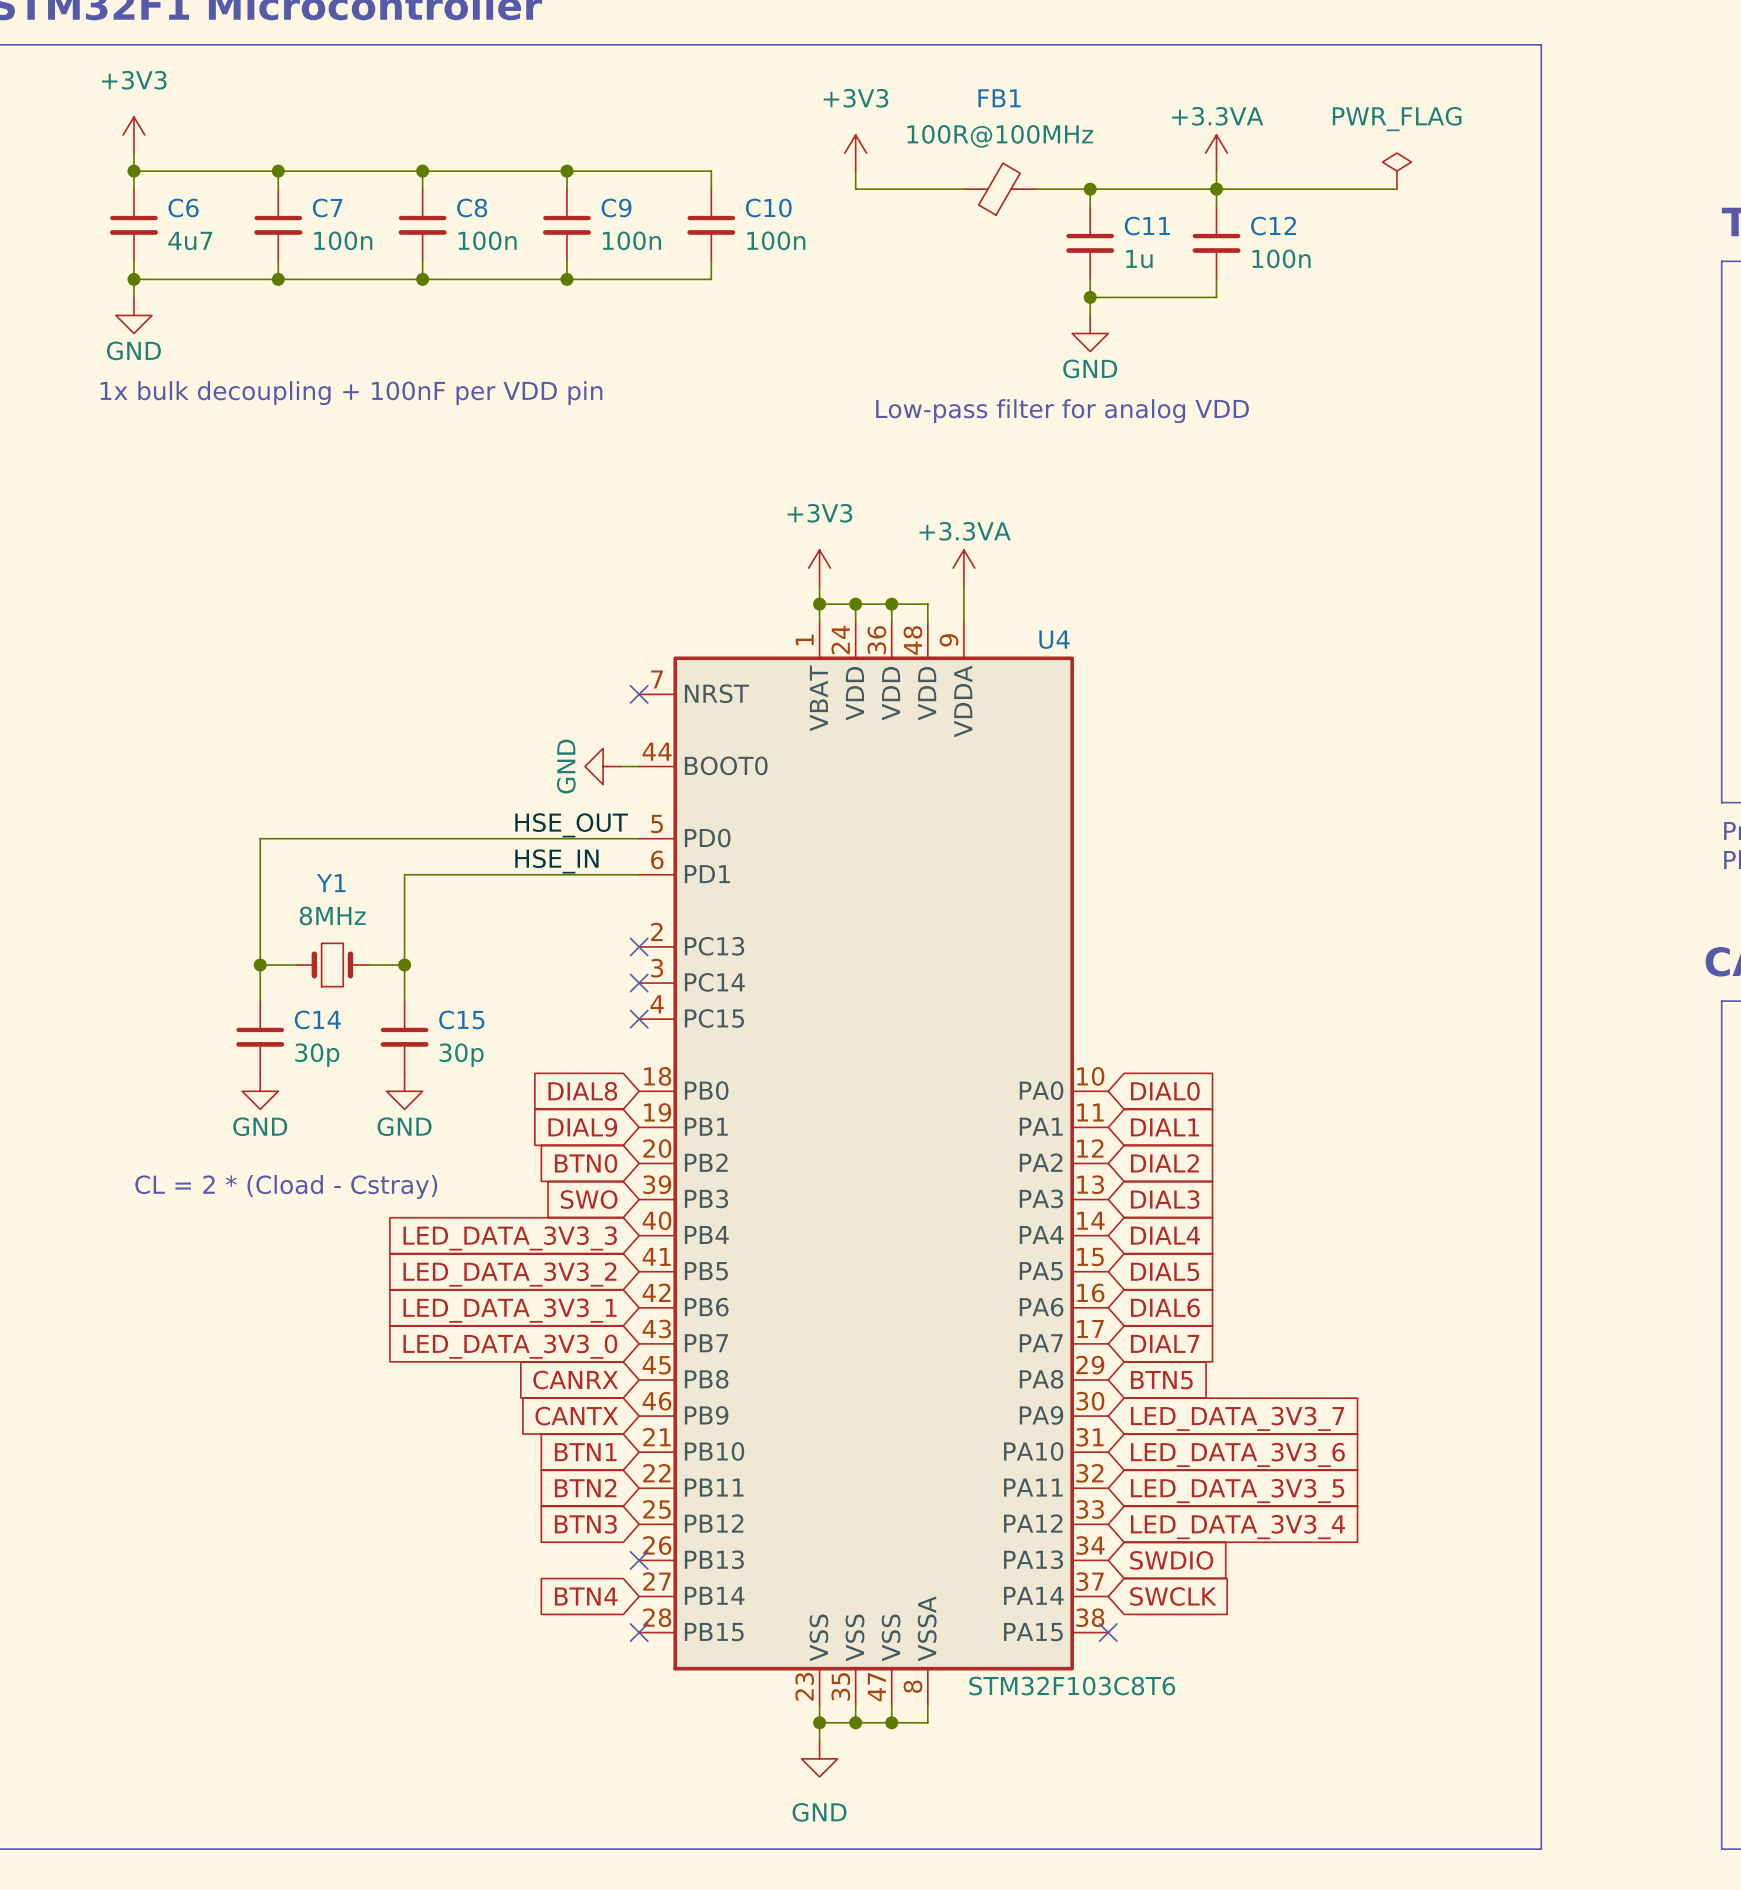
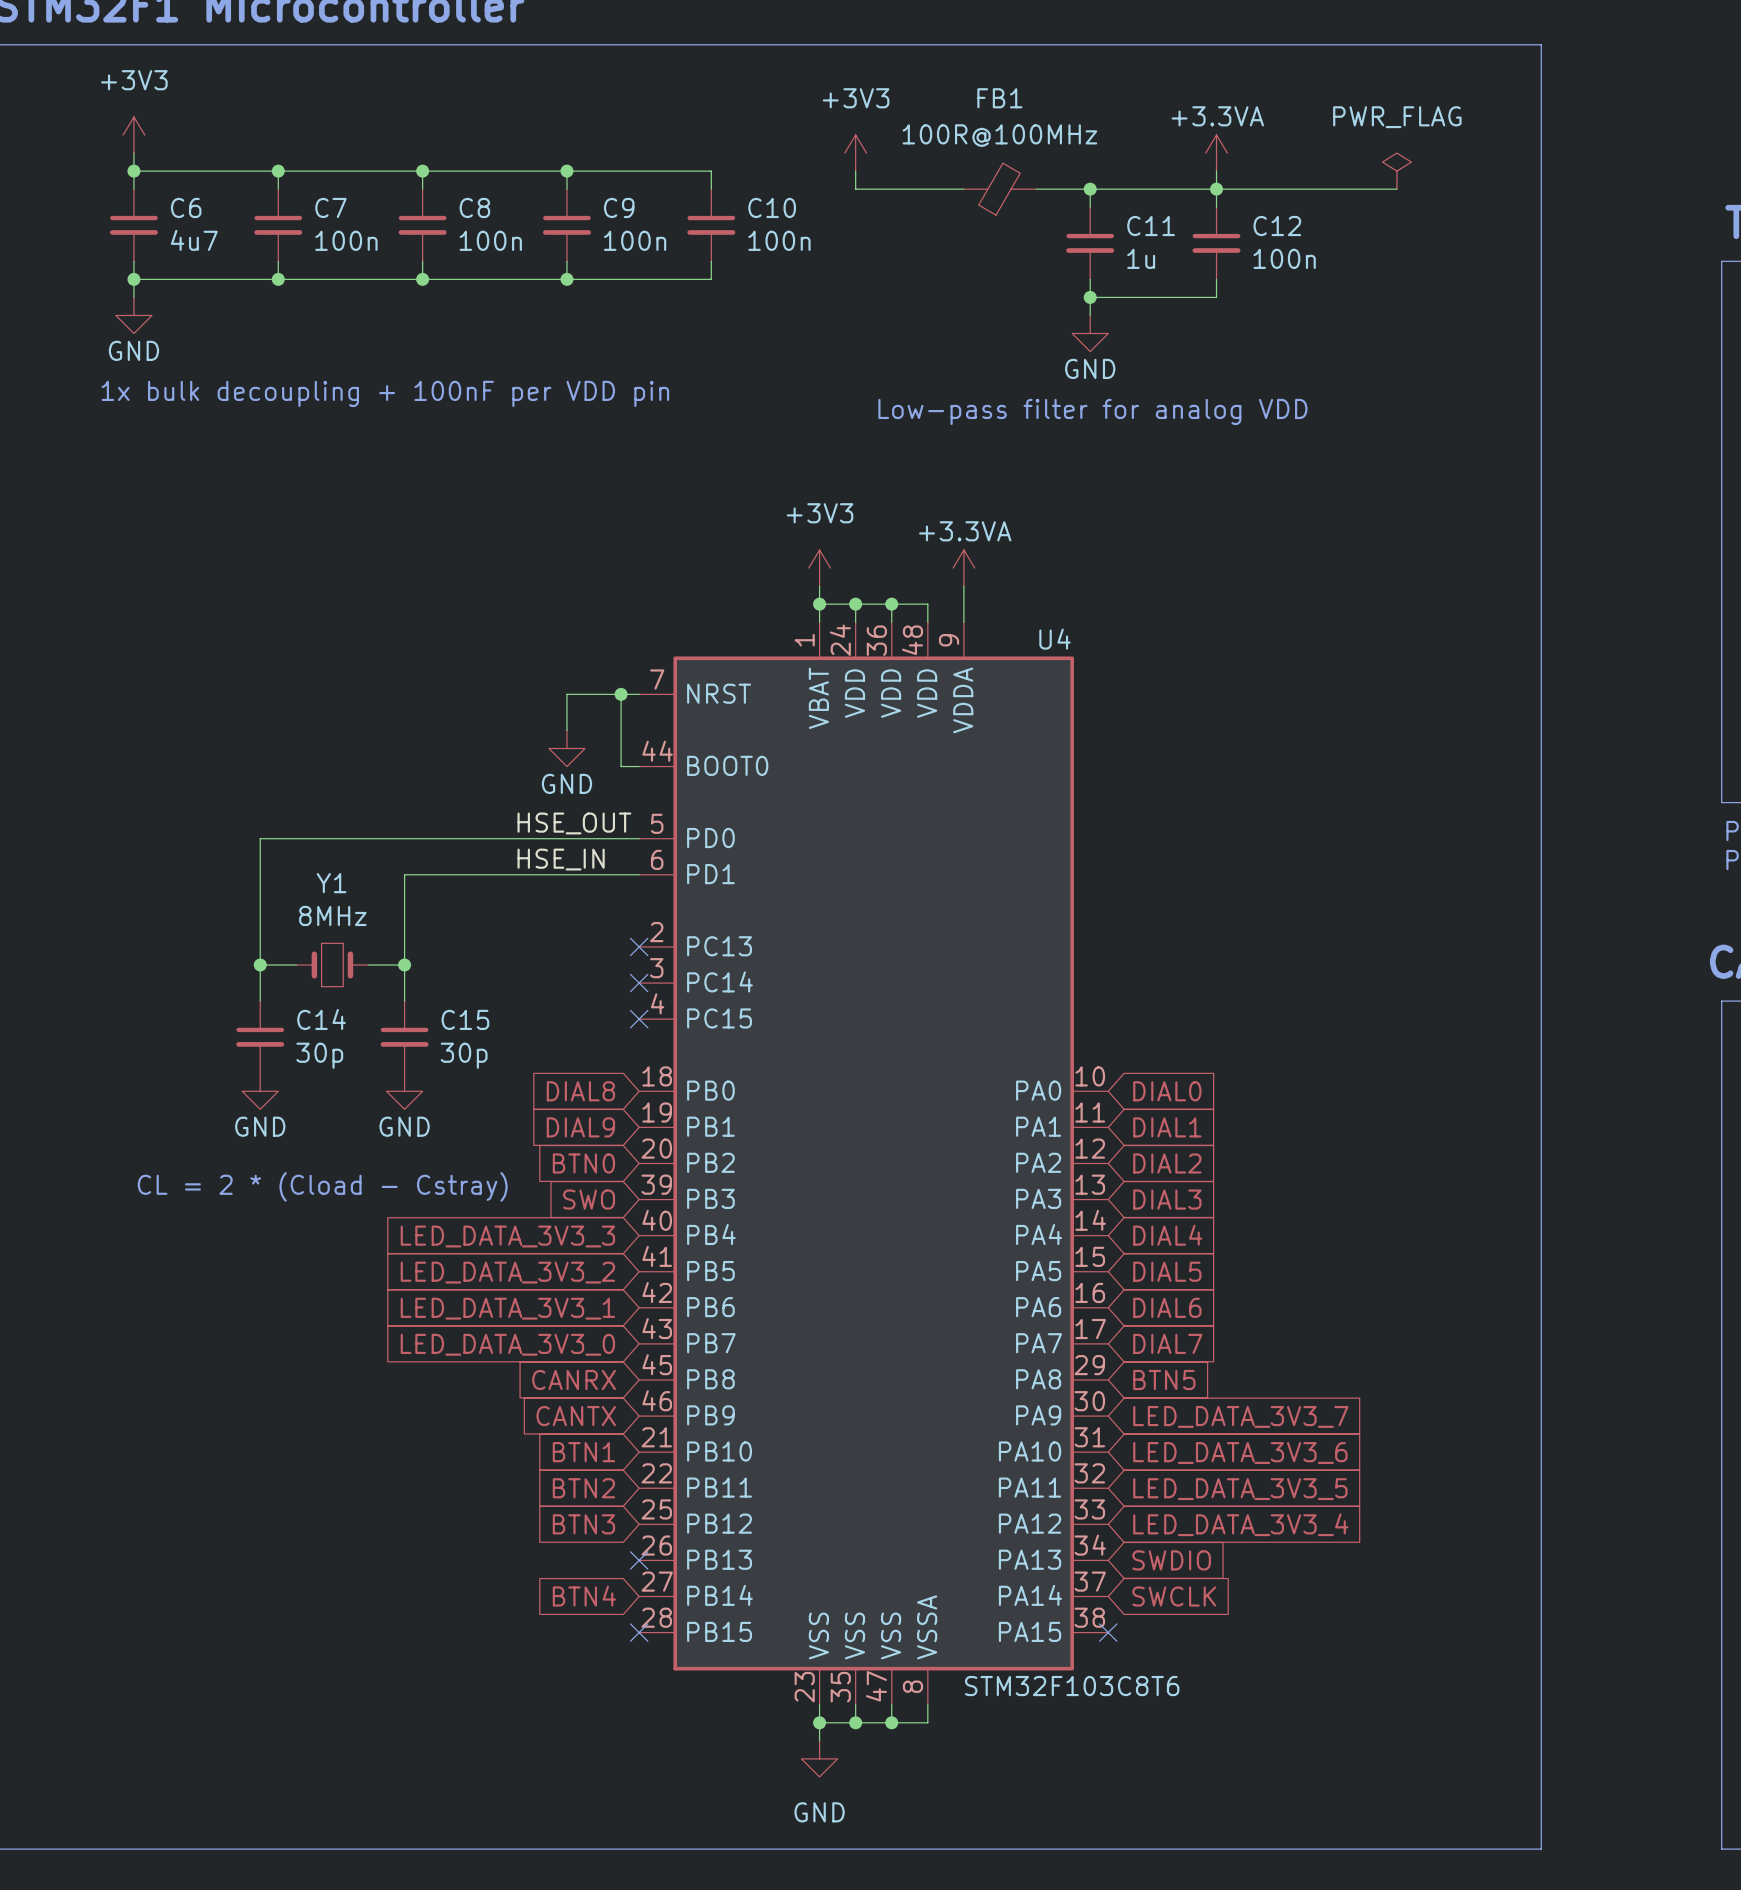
wire: none -> (621, 694) (621, 766)
junction: none -> (621, 694)
wire: none -> (639, 694) (566, 694) (566, 730)
no-connect mark: (639, 694) -> none
power symbol rotation: 0° (603, 766) -> 90° counterclockwise (566, 748)
power symbol position: GND (603, 766) -> GND (566, 748)

